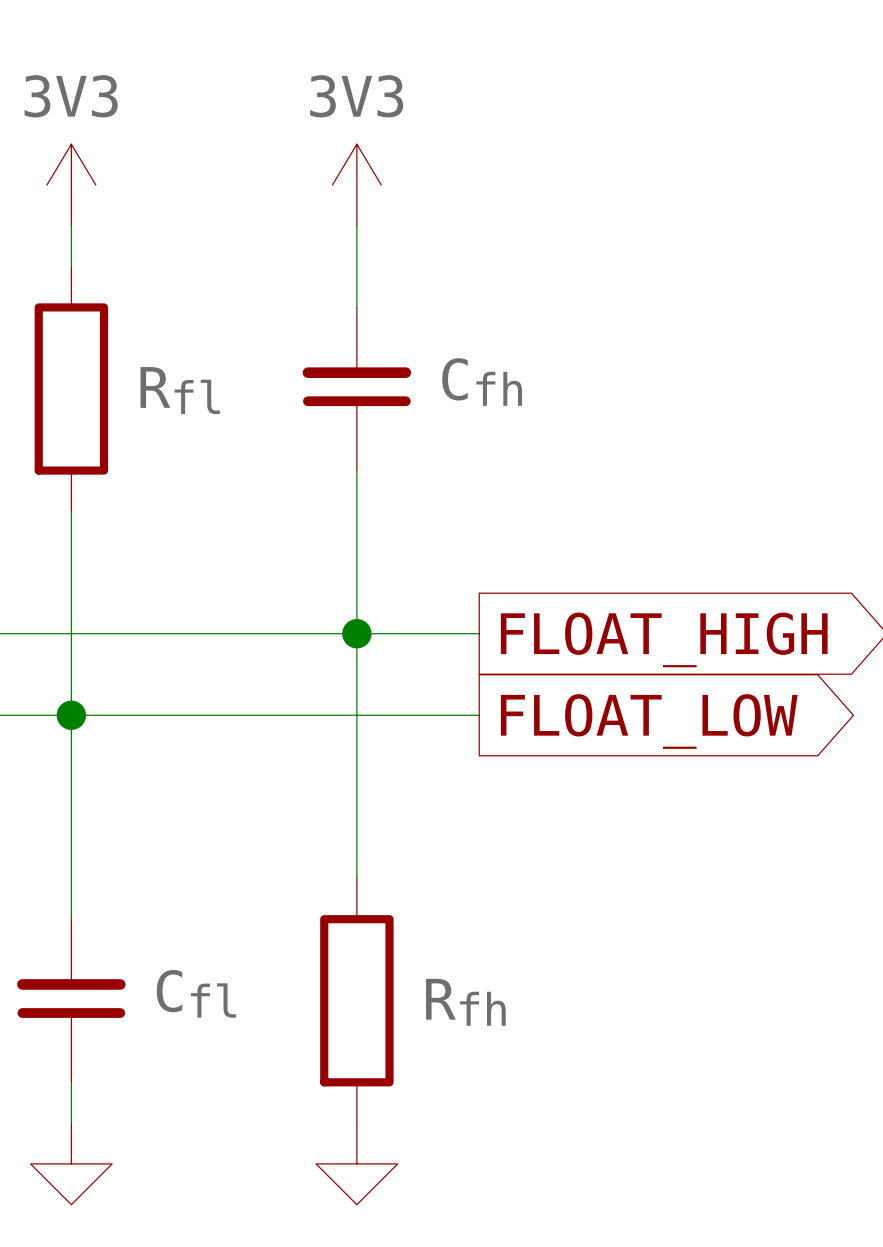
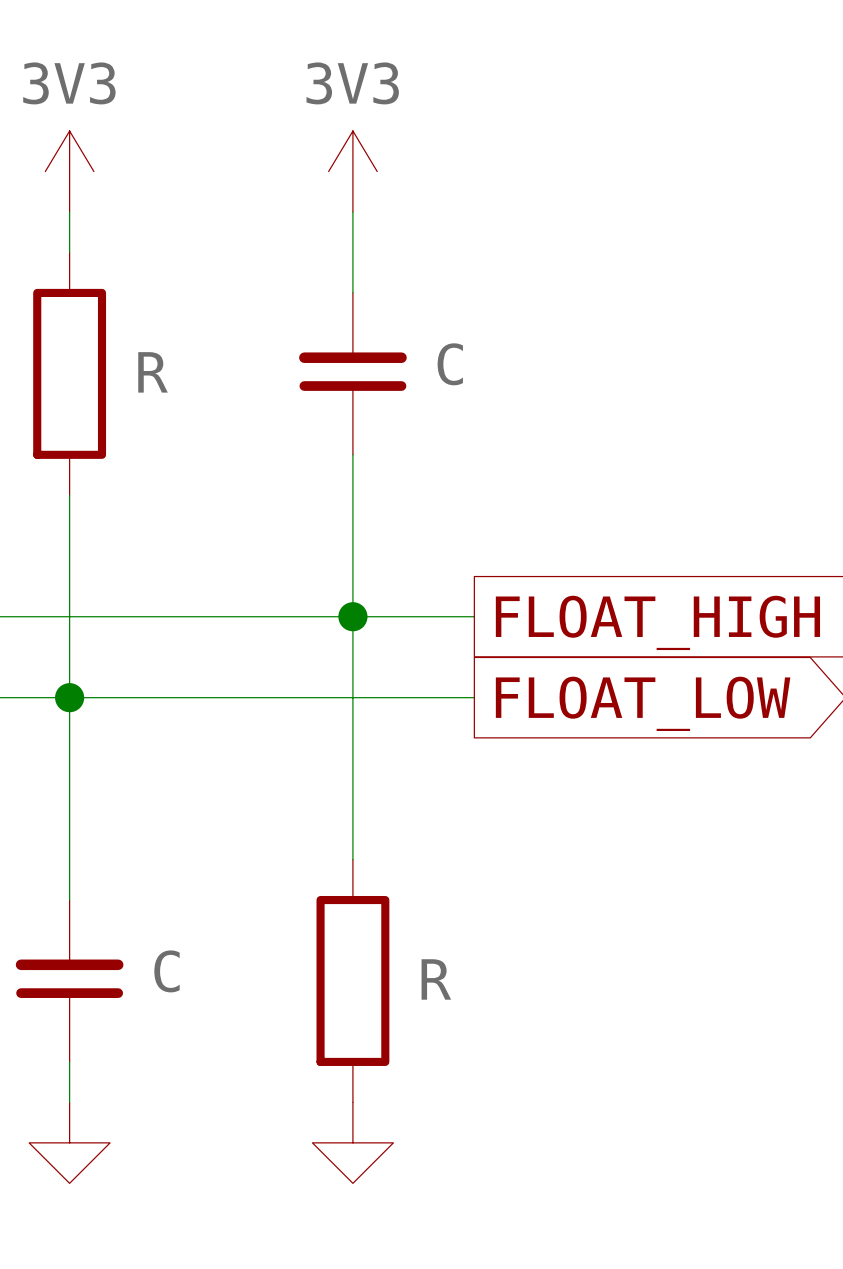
Cfh name: Cfh (482, 382) -> C (450, 364)
Rfl name: Rfl (180, 390) -> R (153, 372)
Cfl name: Cfl (196, 993) -> C (166, 971)
Rfh name: Rfh (465, 1002) -> R (436, 979)

